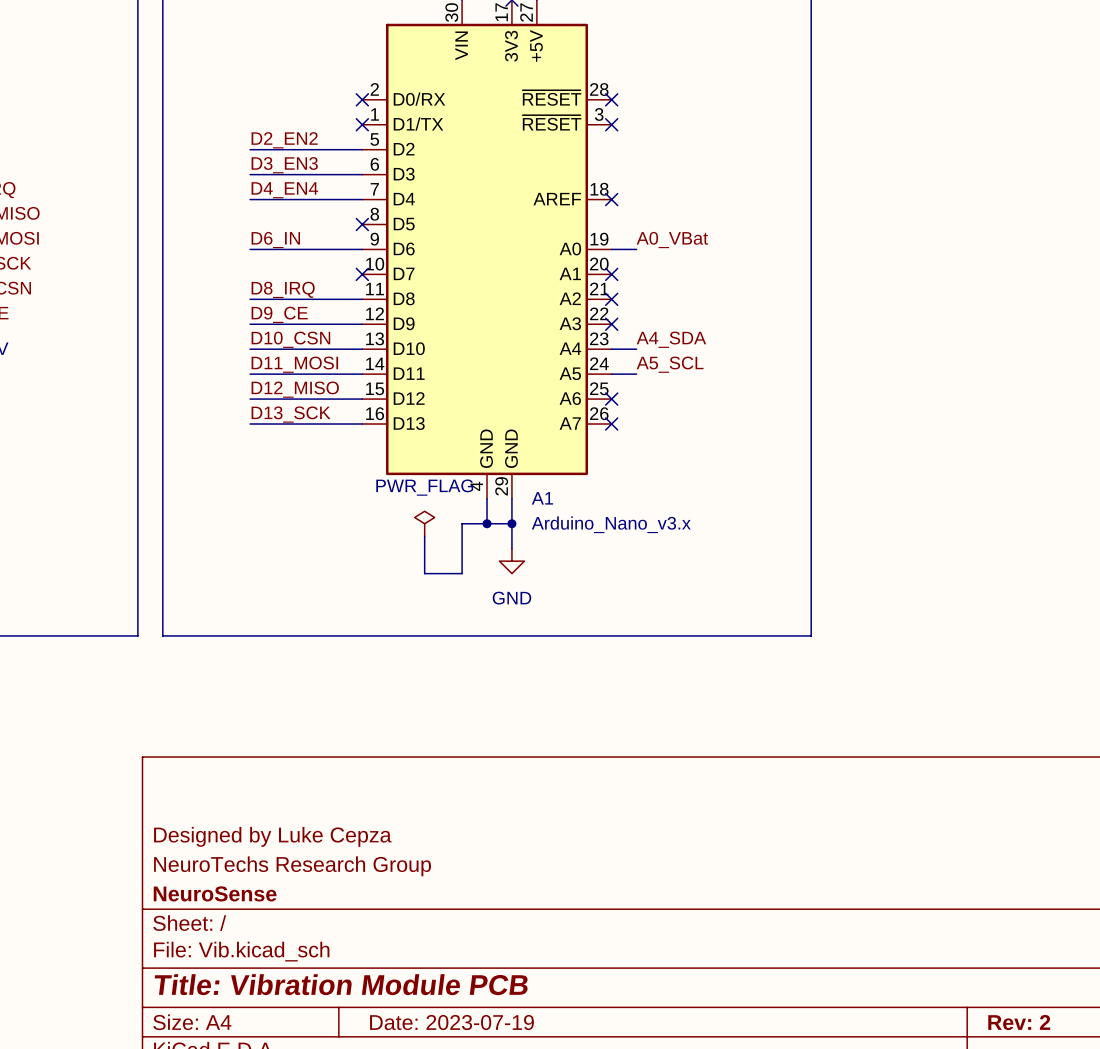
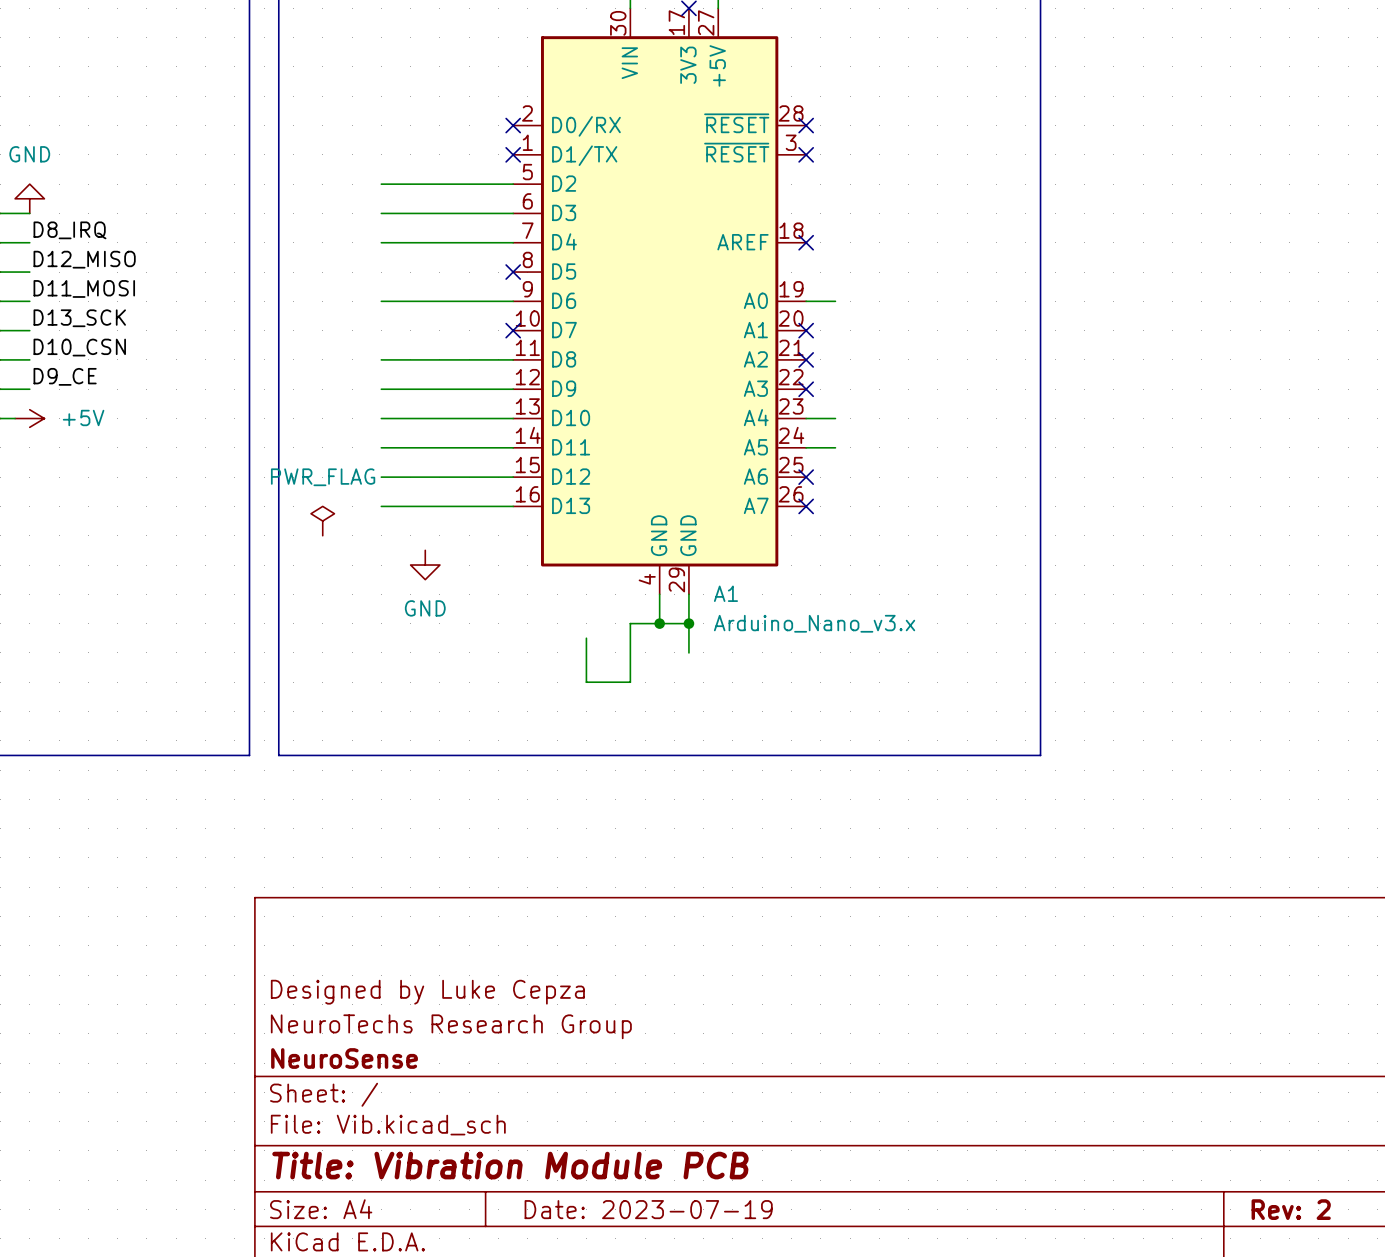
label: D2_EN2 (284, 140) -> none
label: D3_EN3 (284, 165) -> none
label: D4_EN4 (284, 190) -> none
label: D6_IN (275, 240) -> none
label: A0_VBat (672, 240) -> none
label: D8_IRQ (283, 289) -> none
label: D9_CE (279, 314) -> none
label: D10_CSN (290, 339) -> none
label: A4_SDA (671, 339) -> none
label: D11_MOSI (294, 364) -> none
label: A5_SCL (670, 364) -> none
label: D12_MISO (295, 389) -> none
label: D13_SCK (291, 414) -> none
power symbol position: PWR_FLAG (424, 523) -> PWR_FLAG (322, 521)
power symbol position: GND (511, 561) -> GND (425, 565)

